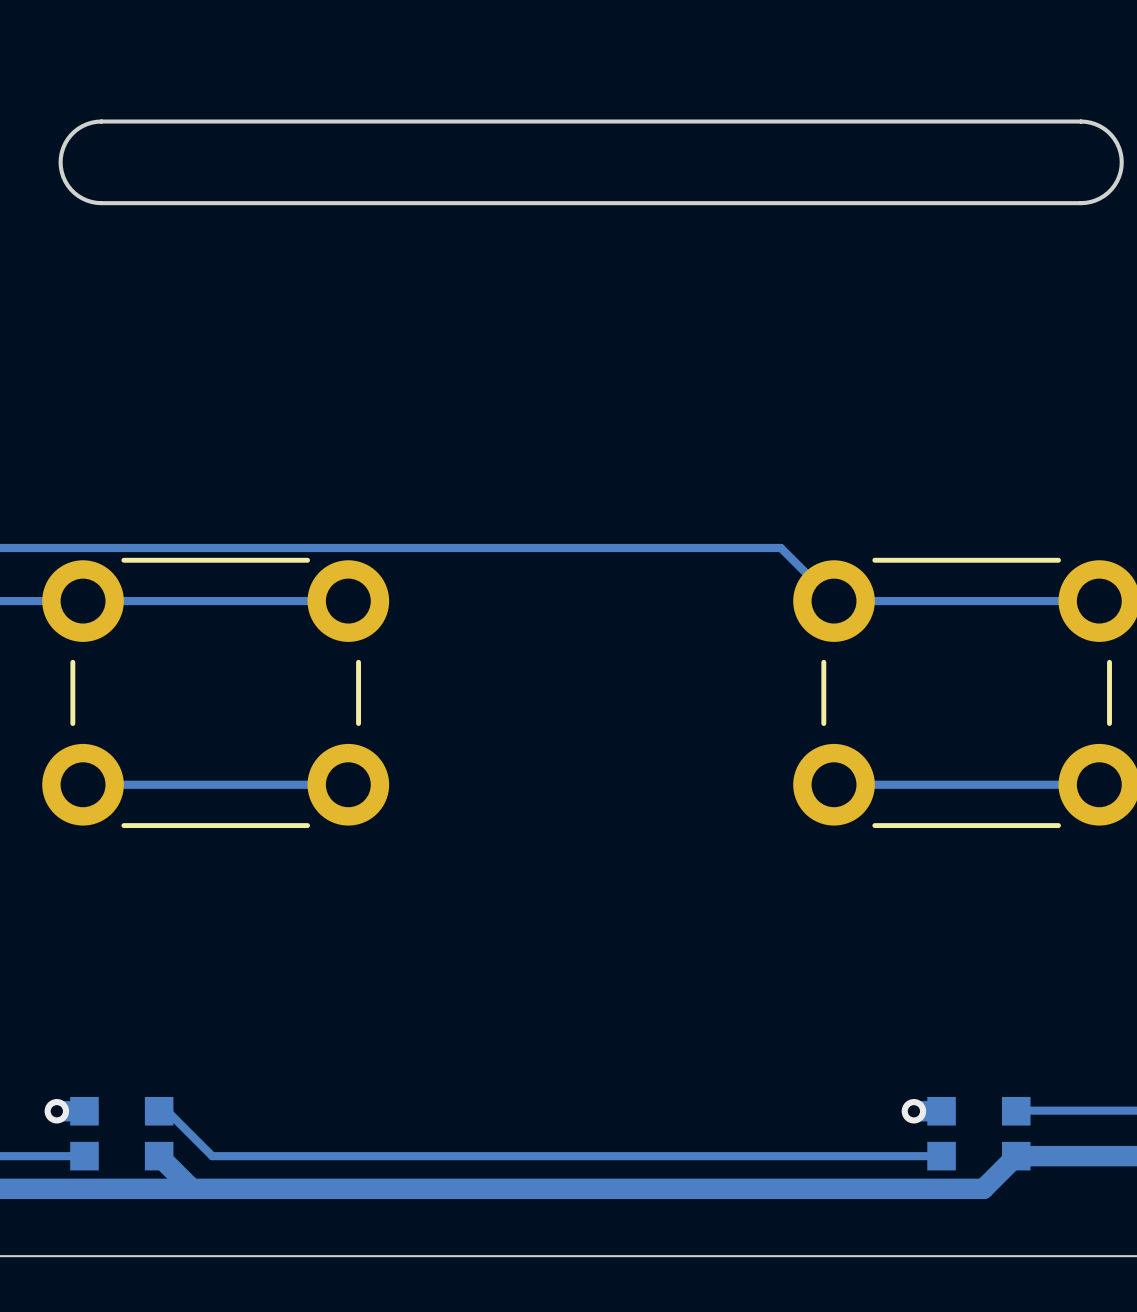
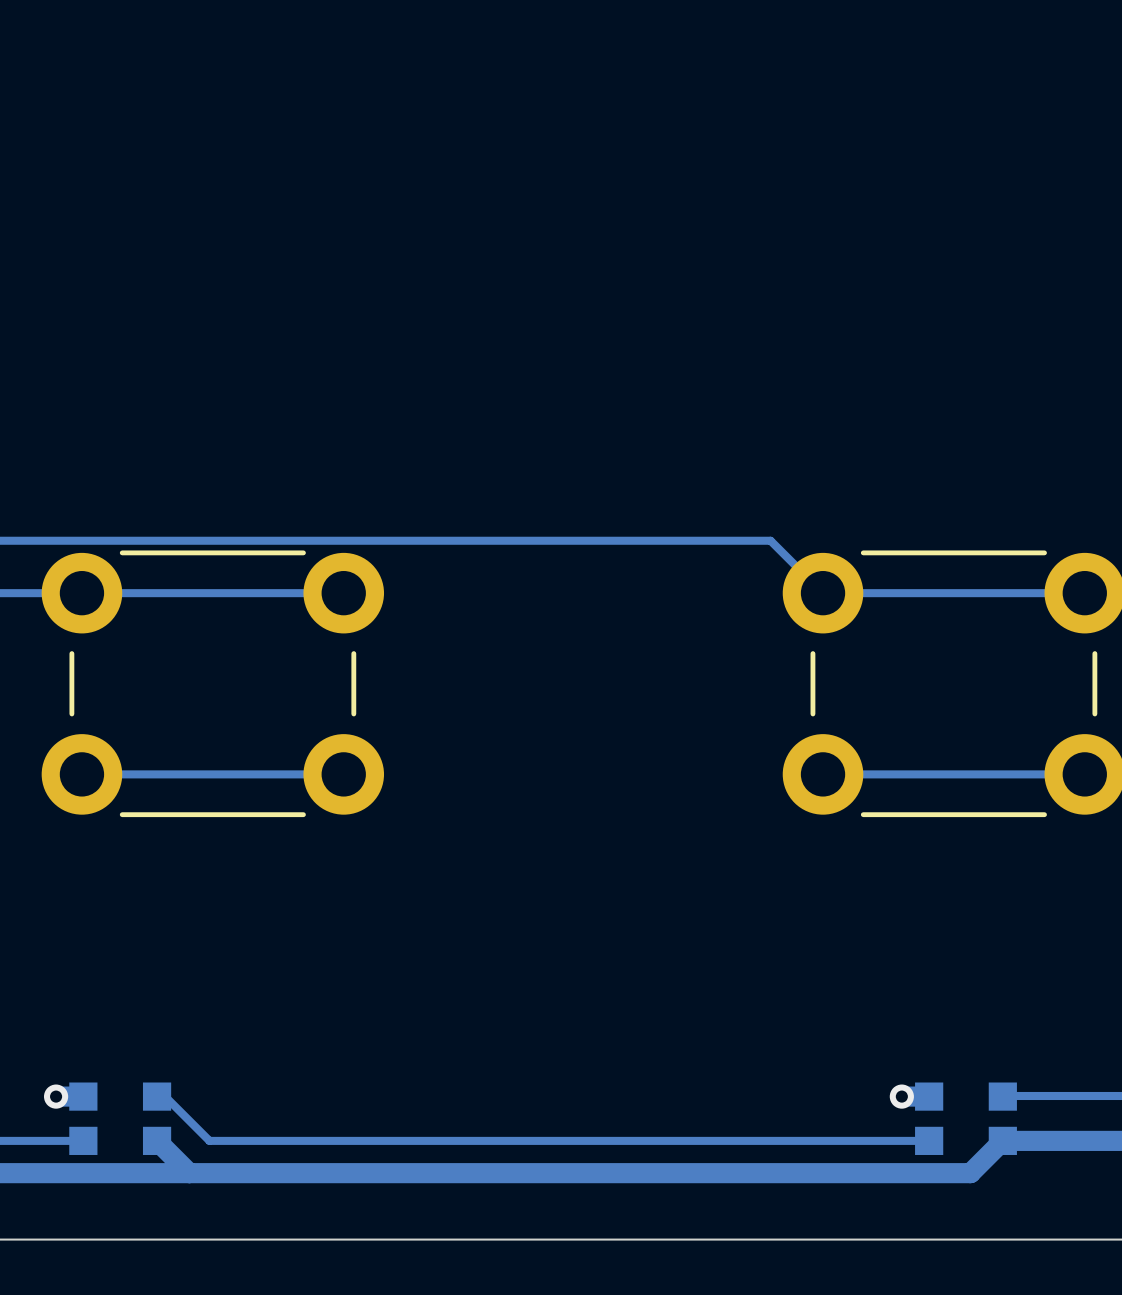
board edge: (101, 121) (1080, 121) (1095, 124) (1111, 135) (1119, 147) (1121, 162) (1119, 176) (1108, 192) (1095, 200) (1080, 203) (101, 203) (86, 200) (70, 189) (63, 176) (60, 162) (63, 147) (74, 131) (86, 124) (101, 121) -> none

